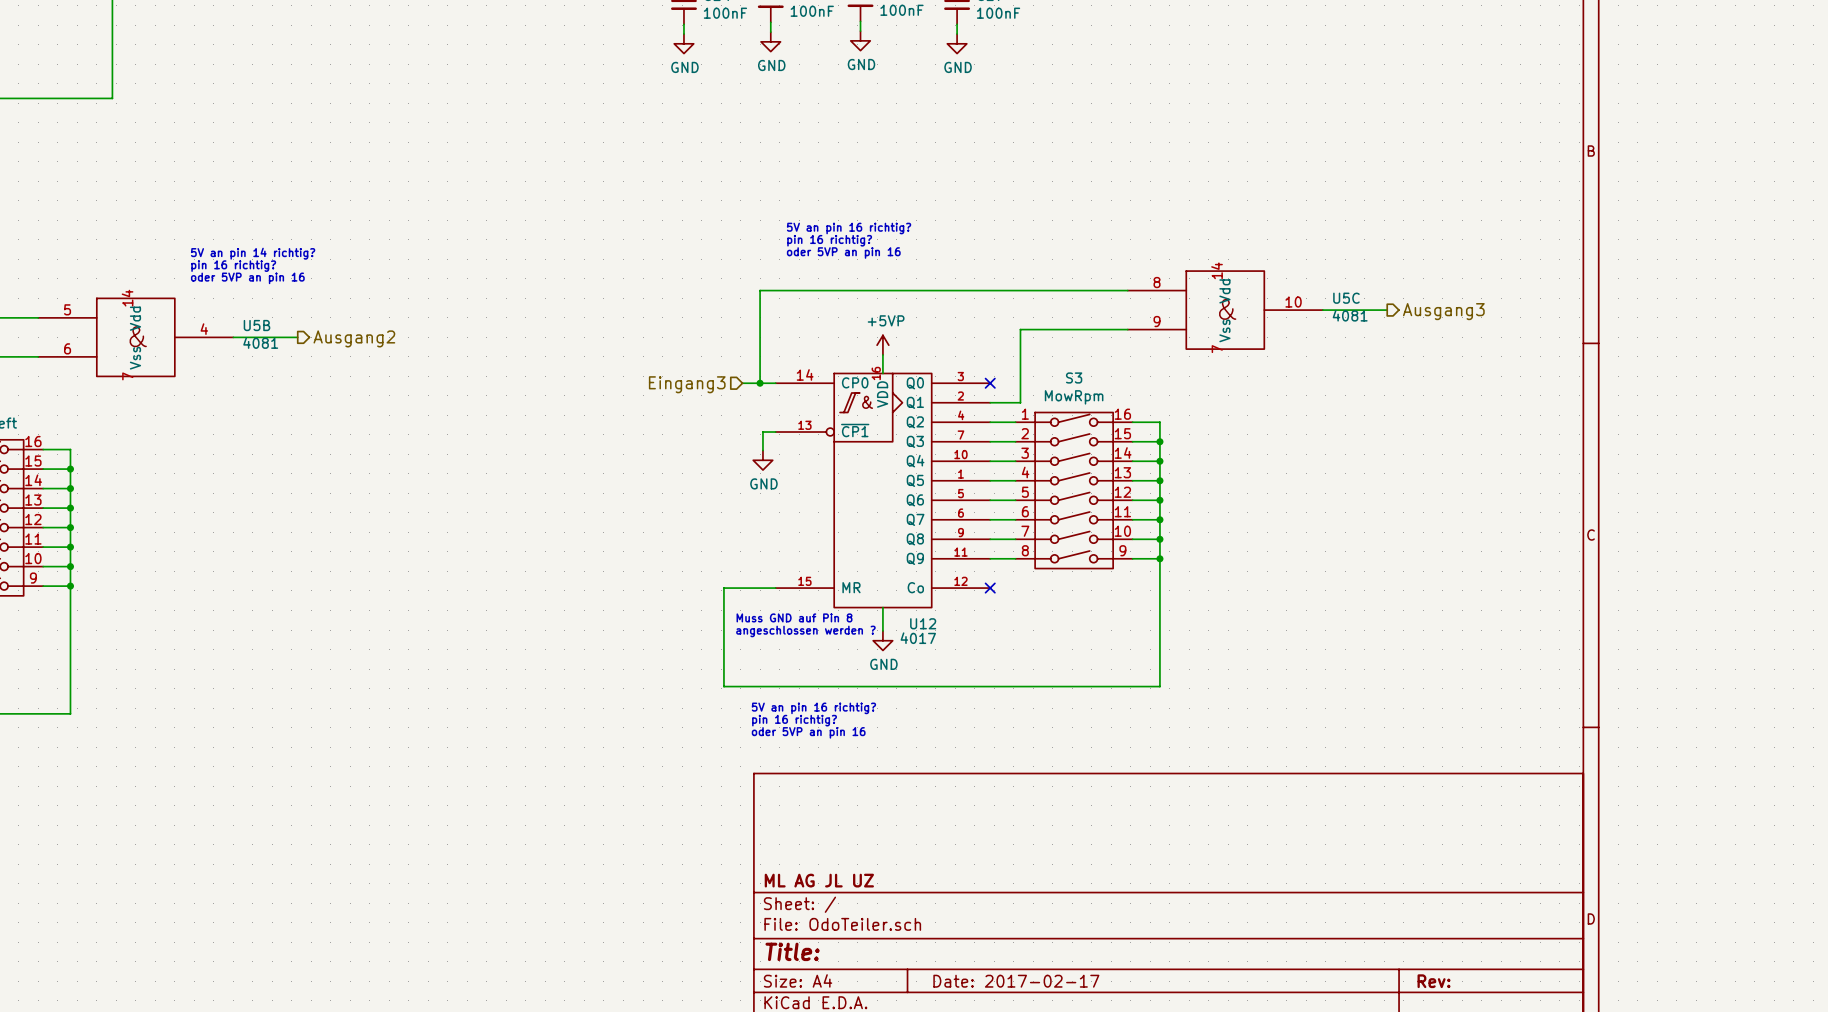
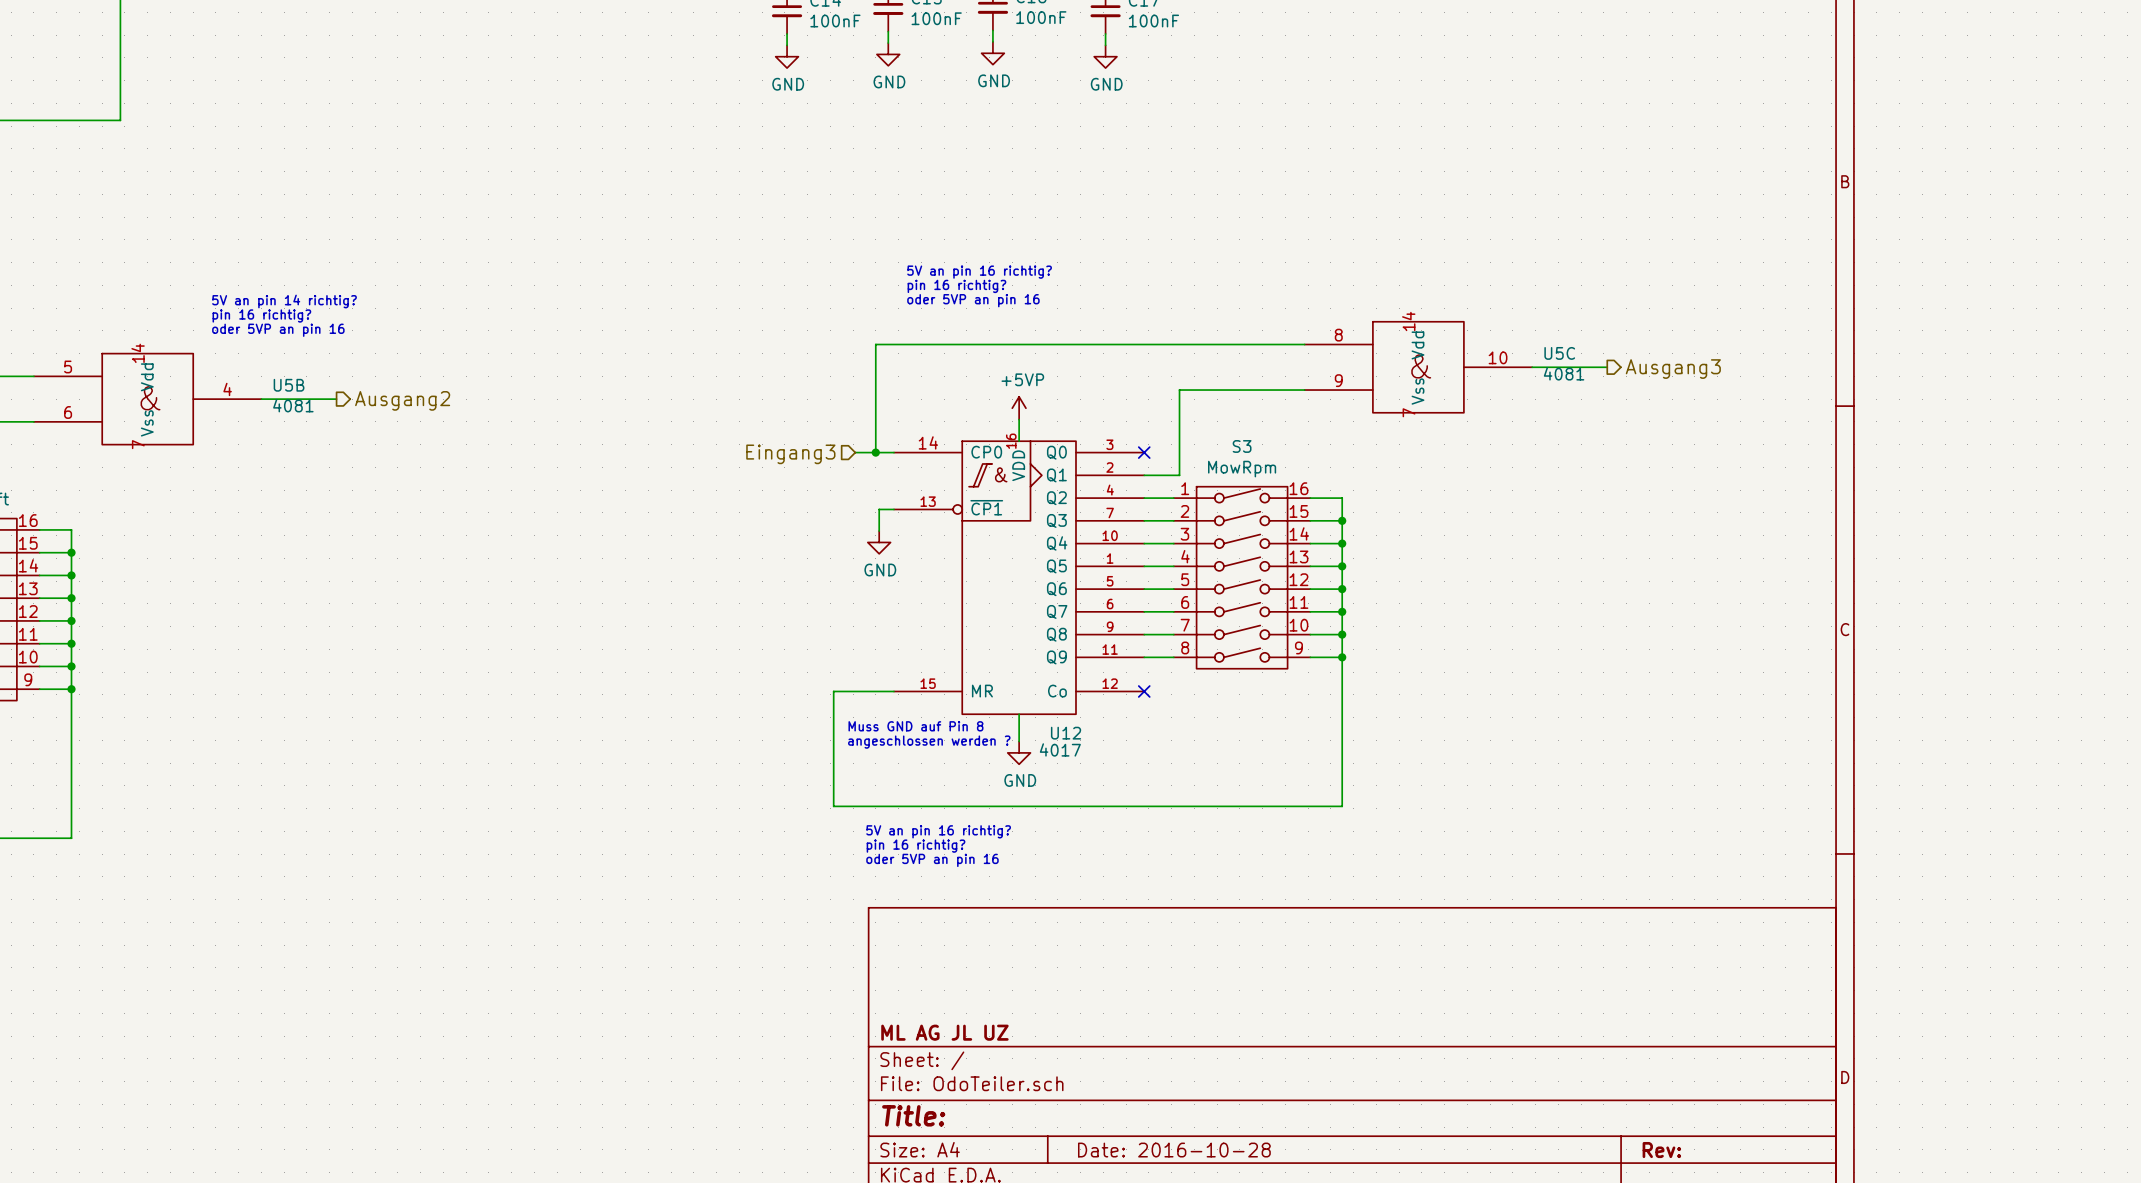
title block: Date: 2017-02-17 (1016, 981) -> Date: 2016-10-28 (1174, 1150)

